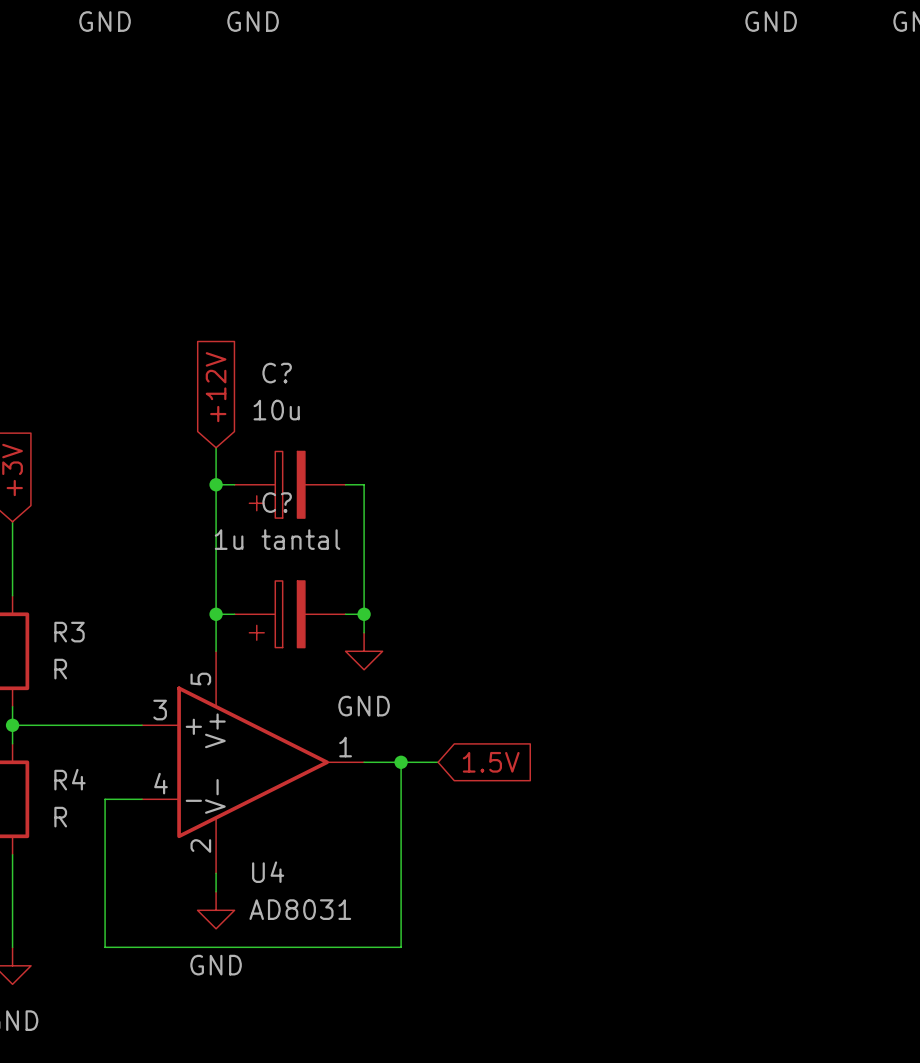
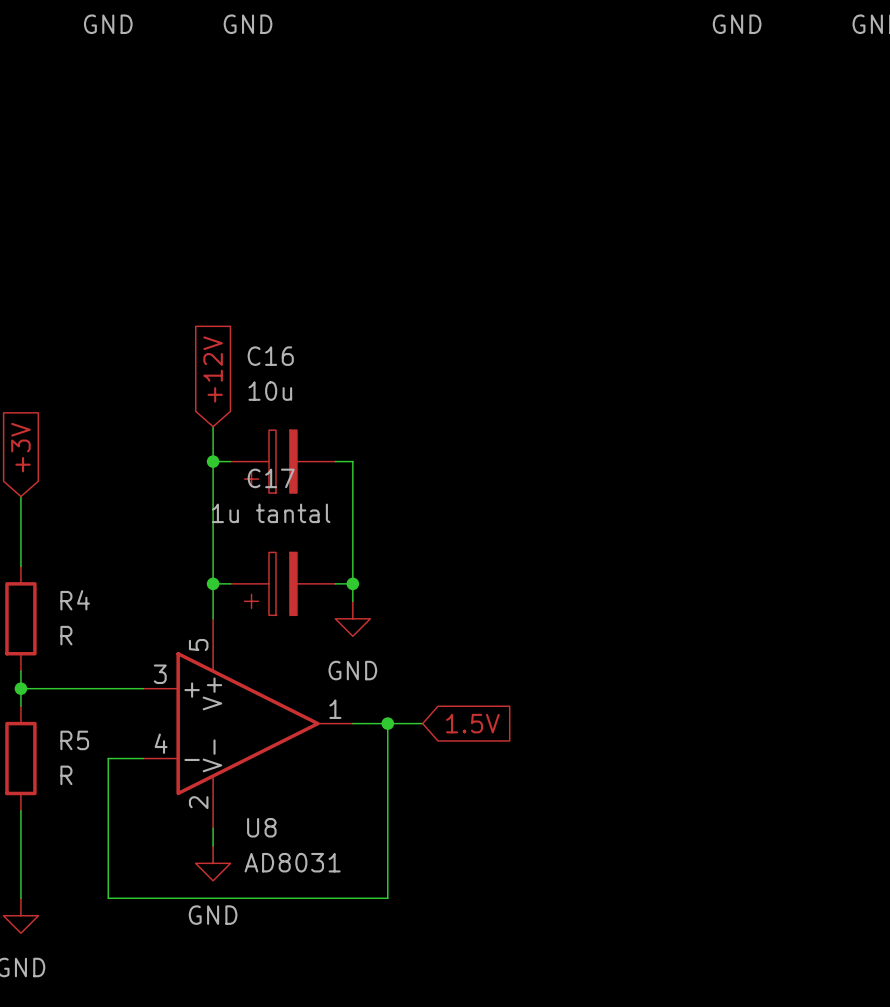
C? name: C? (277, 373) -> C16 (270, 356)
C? name: C? (277, 502) -> C17 (271, 478)
R3 name: R3 (69, 632) -> R4 (75, 600)
R4 name: R4 (69, 779) -> R5 (74, 740)
U4 name: U4 (268, 872) -> U8 (261, 827)

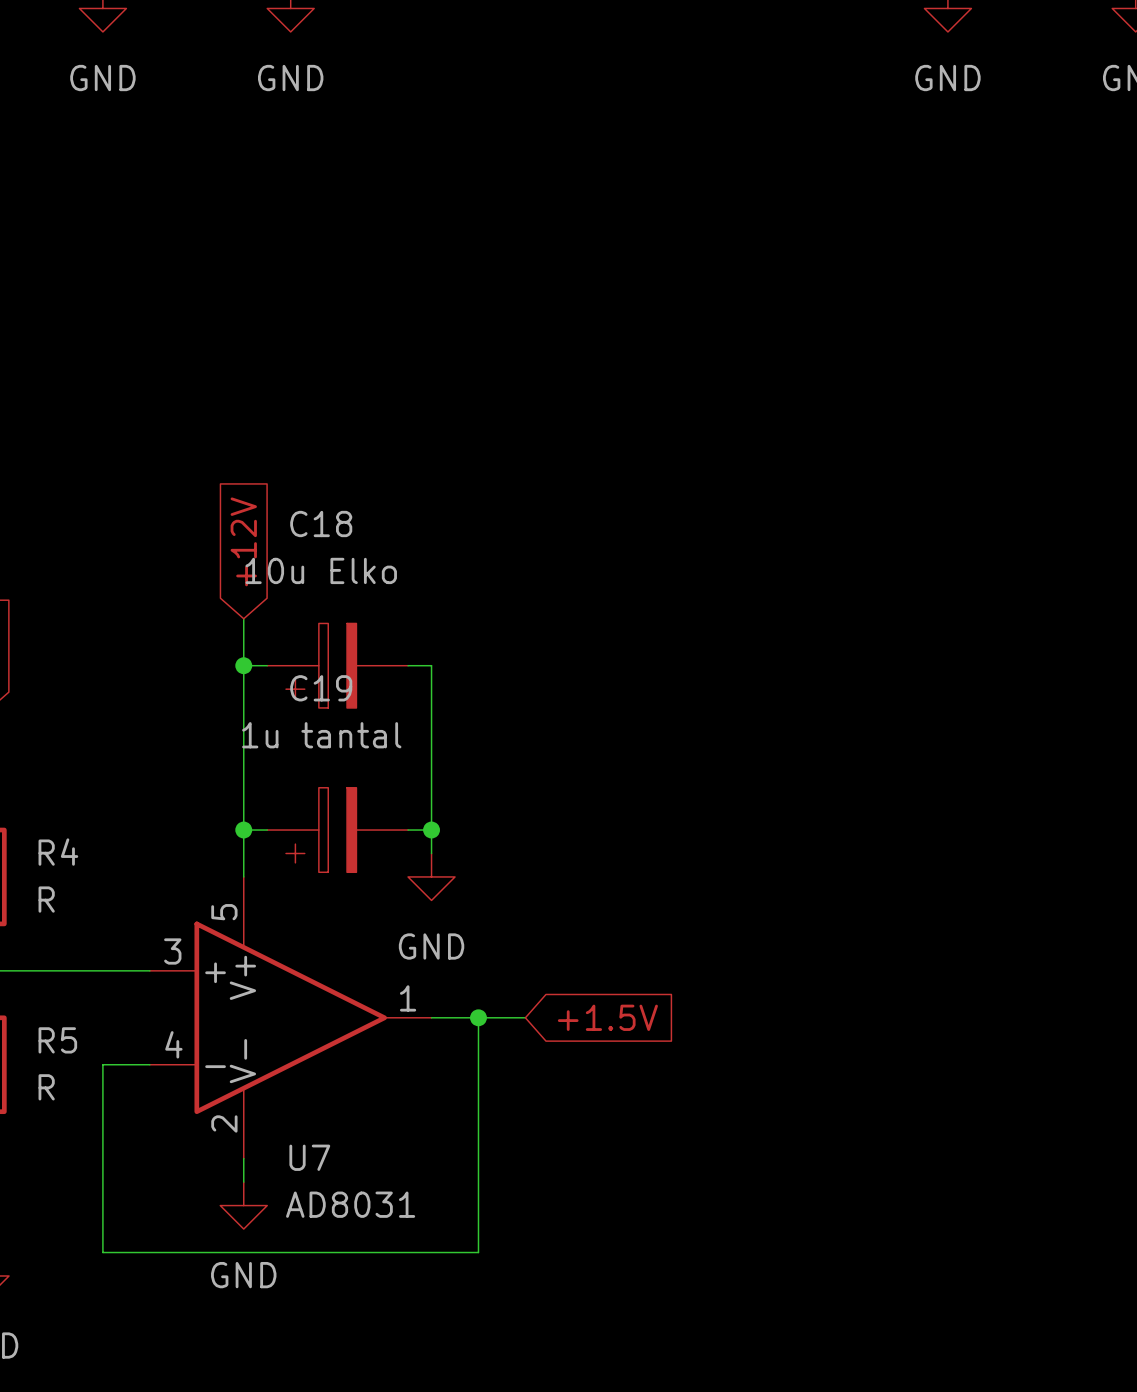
C16 name: C16 (270, 356) -> C18 (321, 523)
C16 value: 10u (270, 391) -> 10u Elko (321, 570)
C17 name: C17 (271, 478) -> C19 (321, 688)
global label: 1.5V (472, 723) -> +1.5V (607, 1017)
U8 name: U8 (261, 827) -> U7 (309, 1157)

